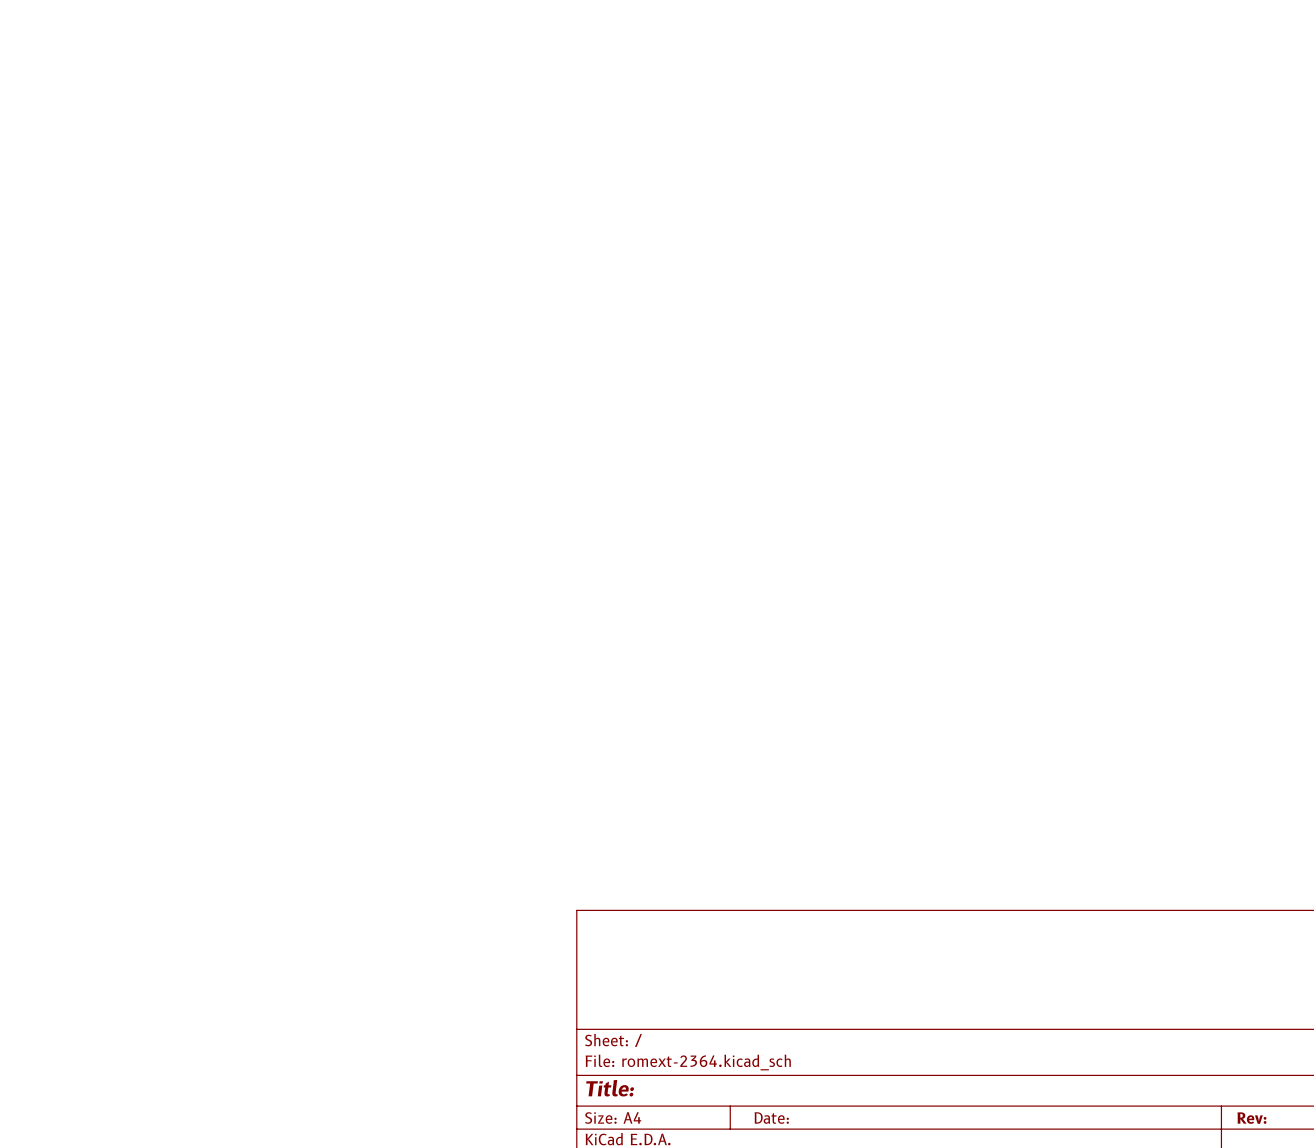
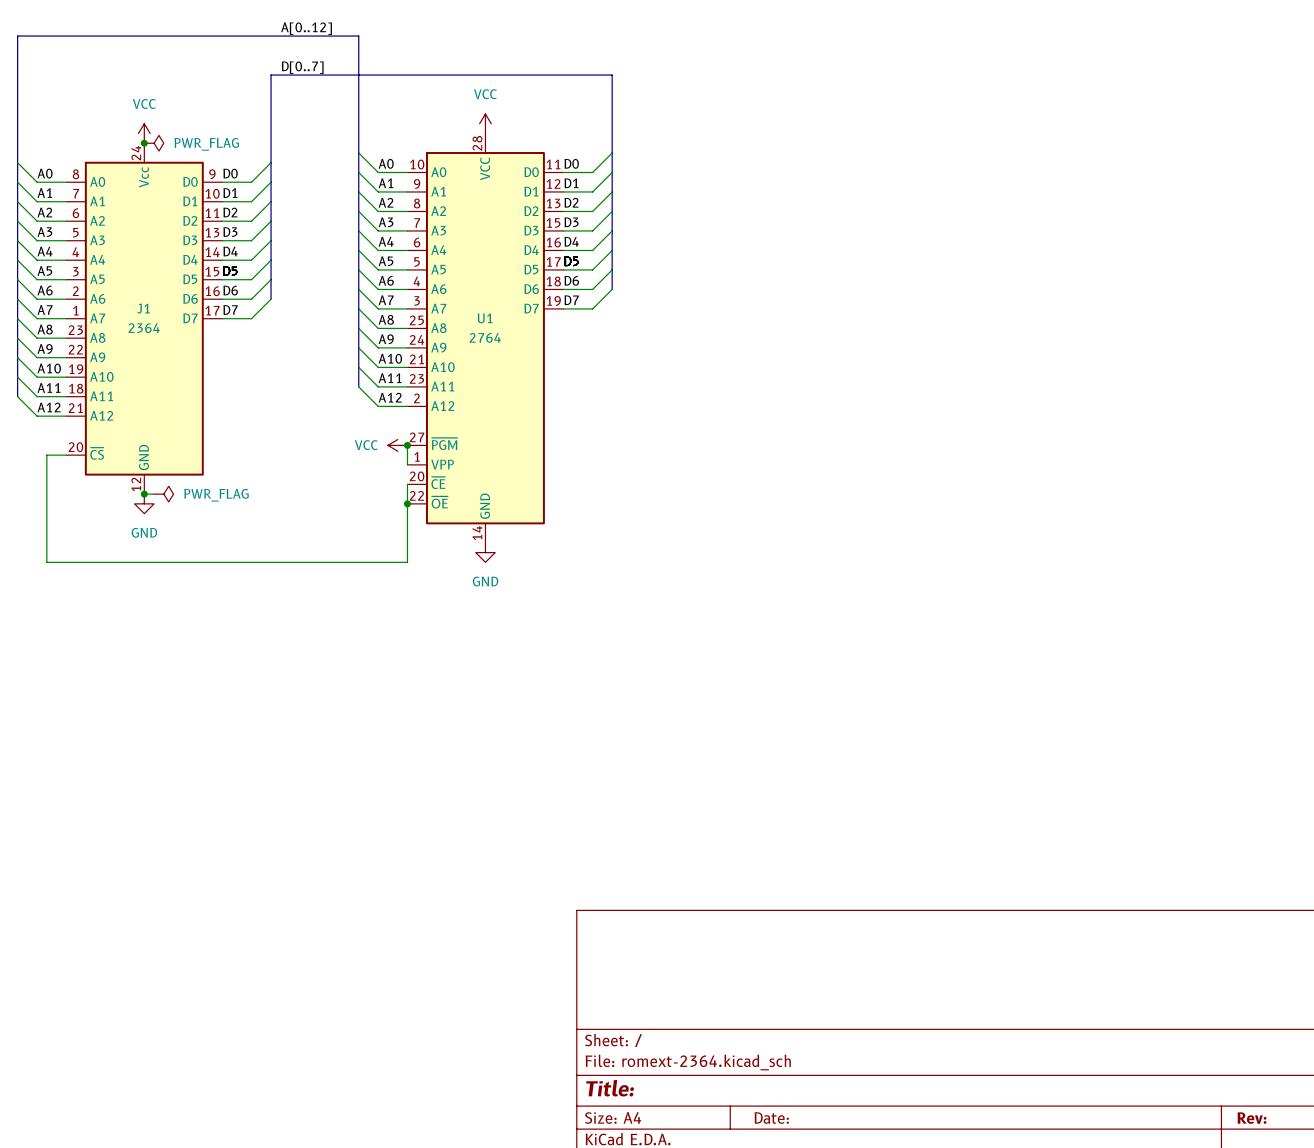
label: none -> A[0..12] (306, 28)
label: none -> D[0..7] (302, 67)
power symbol: none -> VCC (485, 123)
power symbol: none -> VCC (144, 133)
junction: none -> (144, 143)
power symbol: none -> PWR_FLAG (154, 143)
wire: none -> (358, 153) (378, 172) (407, 172)
wire: none -> (612, 153) (592, 172) (563, 172)
wire: none -> (17, 162) (37, 182) (66, 182)
wire: none -> (271, 162) (251, 182) (222, 182)
label: none -> A0 (386, 163)
label: none -> D0 (571, 163)
wire: none -> (358, 172) (378, 191) (407, 191)
wire: none -> (612, 172) (592, 191) (563, 191)
label: none -> A0 (45, 173)
label: none -> D0 (230, 173)
wire: none -> (17, 182) (37, 201) (66, 201)
wire: none -> (271, 182) (251, 201) (222, 201)
label: none -> A1 (385, 183)
label: none -> D1 (571, 183)
wire: none -> (358, 191) (378, 211) (407, 211)
wire: none -> (612, 191) (592, 211) (563, 211)
label: none -> A1 (44, 193)
label: none -> D1 (230, 193)
wire: none -> (17, 201) (37, 221) (66, 221)
wire: none -> (271, 201) (251, 221) (222, 221)
label: none -> A2 (385, 202)
label: none -> D2 (571, 202)
wire: none -> (358, 211) (378, 230) (407, 230)
wire: none -> (612, 211) (592, 230) (563, 230)
label: none -> A2 (44, 212)
label: none -> D2 (230, 212)
wire: none -> (17, 221) (37, 240) (66, 240)
wire: none -> (271, 221) (251, 240) (222, 240)
label: none -> A3 (386, 222)
label: none -> D3 (571, 222)
wire: none -> (358, 230) (378, 250) (407, 250)
wire: none -> (612, 230) (592, 250) (563, 250)
label: none -> A3 (44, 232)
label: none -> D3 (230, 232)
wire: none -> (17, 240) (37, 260) (66, 260)
wire: none -> (271, 240) (251, 260) (222, 260)
label: none -> A4 (386, 241)
label: none -> D4 (571, 241)
wire: none -> (358, 250) (378, 269) (407, 269)
wire: none -> (612, 250) (592, 269) (563, 269)
label: none -> A4 (45, 251)
label: none -> D4 (230, 251)
wire: none -> (17, 260) (37, 279) (66, 279)
wire: none -> (271, 260) (251, 279) (222, 279)
label: none -> A5 (385, 261)
label: none -> D5 (571, 261)
wire: none -> (358, 269) (378, 289) (407, 289)
wire: none -> (612, 269) (592, 289) (563, 289)
label: none -> A5 (44, 271)
label: none -> D5 (230, 271)
wire: none -> (17, 279) (37, 299) (66, 299)
wire: none -> (271, 279) (251, 299) (222, 299)
label: none -> A6 (386, 280)
label: none -> D6 (571, 280)
wire: none -> (358, 289) (378, 308) (407, 308)
wire: none -> (612, 289) (592, 308) (563, 308)
bus: none -> (612, 289) (612, 75) (271, 75) (271, 299)
label: none -> A6 (45, 290)
label: none -> D6 (230, 290)
wire: none -> (17, 299) (37, 318) (66, 318)
wire: none -> (271, 299) (251, 318) (222, 318)
label: none -> A7 (386, 300)
label: none -> D7 (571, 300)
wire: none -> (358, 308) (378, 328) (407, 328)
label: none -> A7 (45, 309)
label: none -> D7 (230, 310)
wire: none -> (17, 318) (37, 338) (66, 338)
J1: none -> 2364 (144, 318)
label: none -> A8 (386, 319)
wire: none -> (358, 328) (378, 347) (407, 347)
label: none -> A8 (45, 329)
wire: none -> (17, 338) (37, 357) (66, 357)
U1: none -> 2764 (485, 338)
label: none -> A9 (386, 339)
wire: none -> (358, 347) (378, 367) (407, 367)
label: none -> A9 (45, 349)
wire: none -> (17, 357) (37, 377) (66, 377)
label: none -> A10 (390, 358)
wire: none -> (358, 367) (378, 386) (407, 386)
label: none -> A10 (49, 368)
wire: none -> (17, 377) (37, 396) (66, 396)
label: none -> A11 (390, 378)
wire: none -> (358, 386) (378, 406) (407, 406)
bus: none -> (358, 386) (358, 36) (17, 36) (17, 396)
label: none -> A11 (49, 387)
wire: none -> (17, 396) (37, 416) (66, 416)
label: none -> A12 (390, 397)
label: none -> A12 (49, 407)
power symbol: none -> VCC (397, 445)
wire: none -> (407, 445) (407, 464)
junction: none -> (407, 445)
wire: none -> (66, 455) (46, 455) (46, 562) (407, 562) (407, 484)
wire: none -> (144, 494) (154, 494)
junction: none -> (144, 494)
power symbol: none -> PWR_FLAG (163, 494)
power symbol: none -> GND (144, 503)
junction: none -> (407, 503)
power symbol: none -> GND (485, 552)

